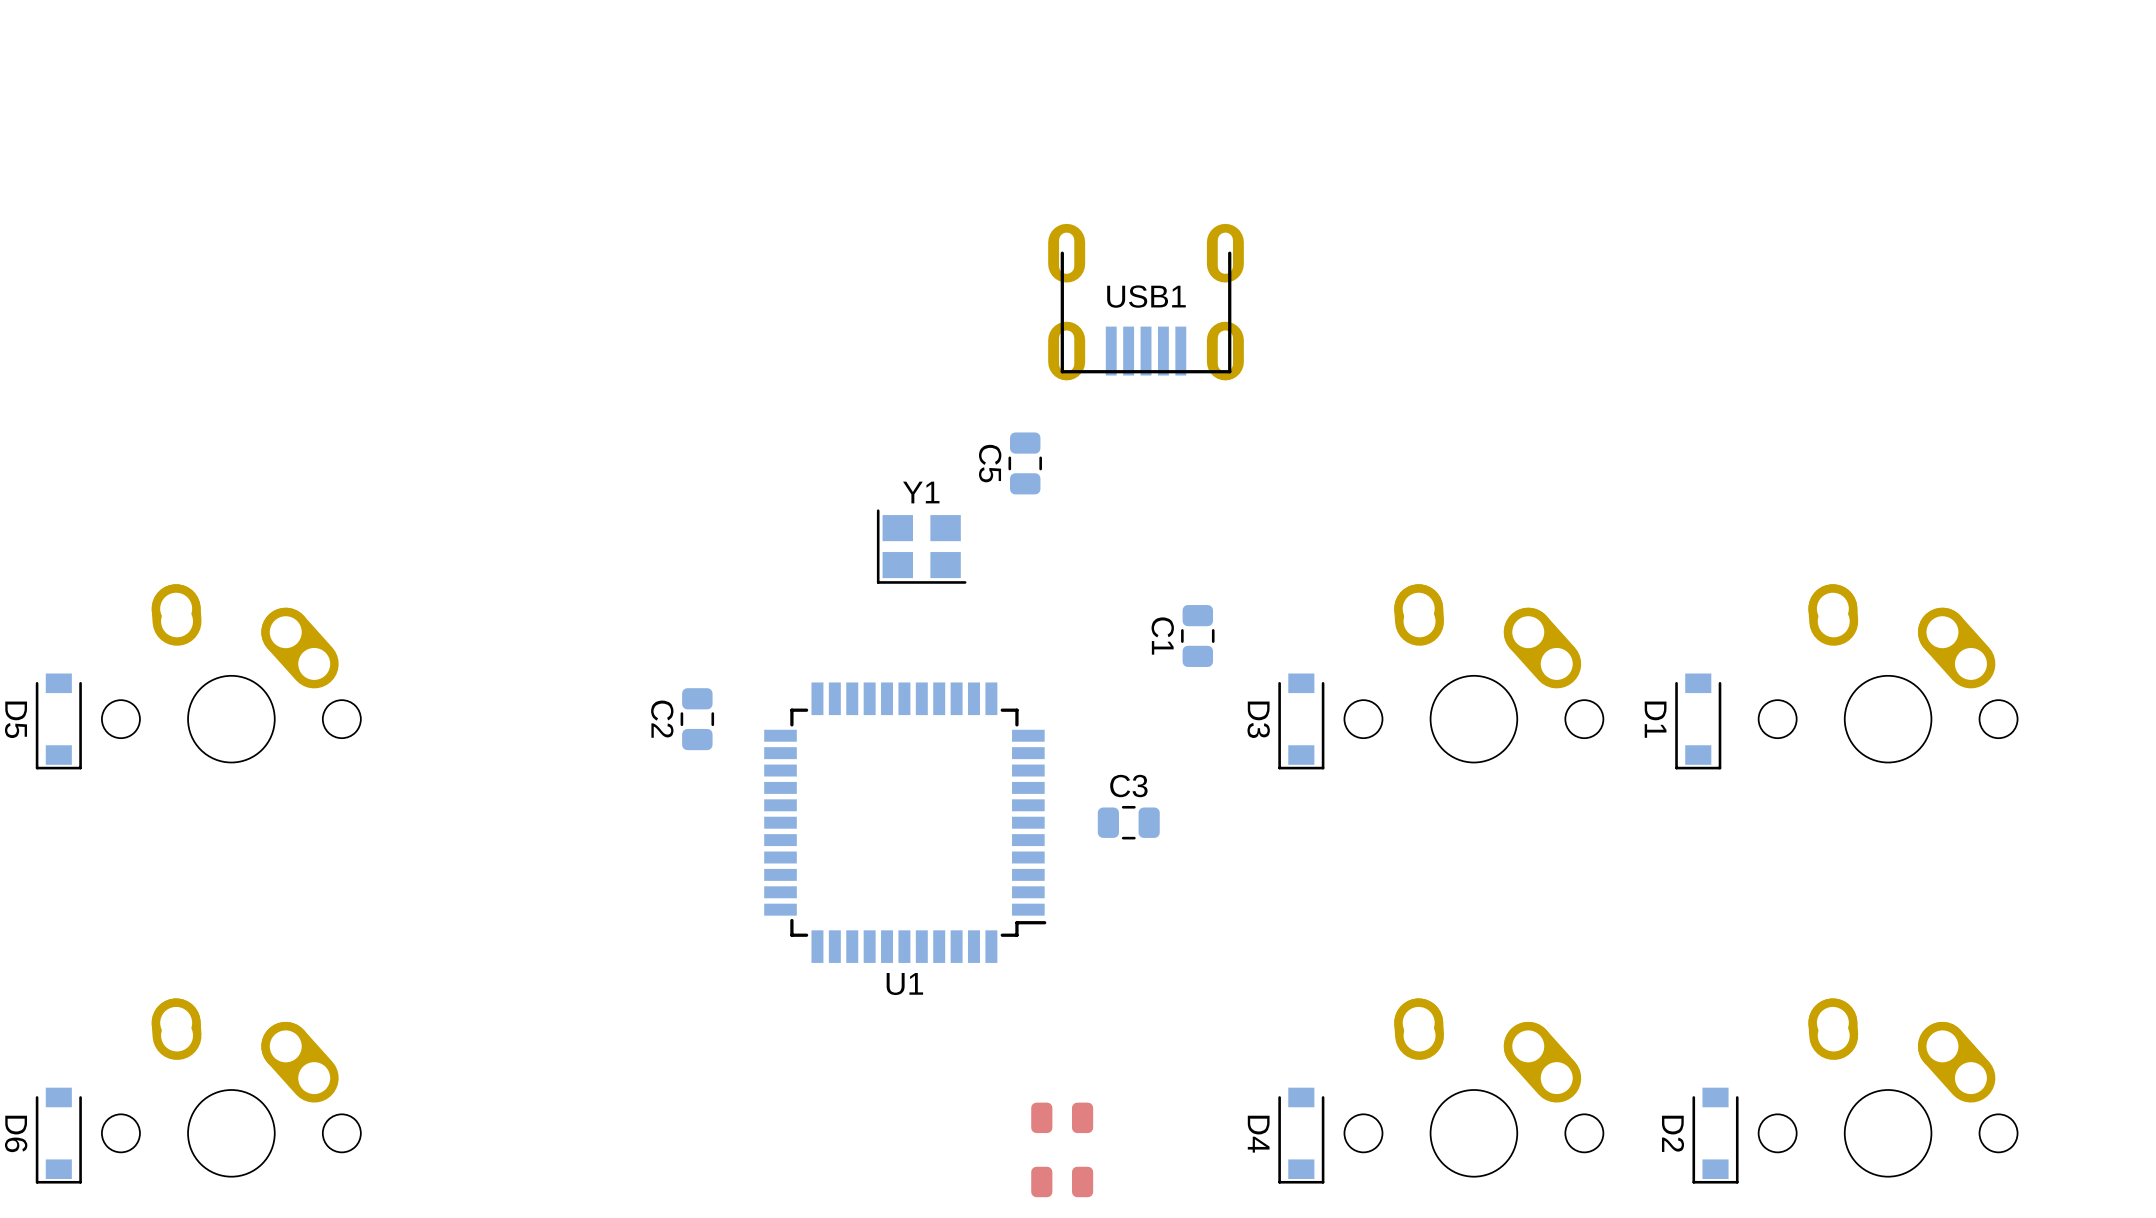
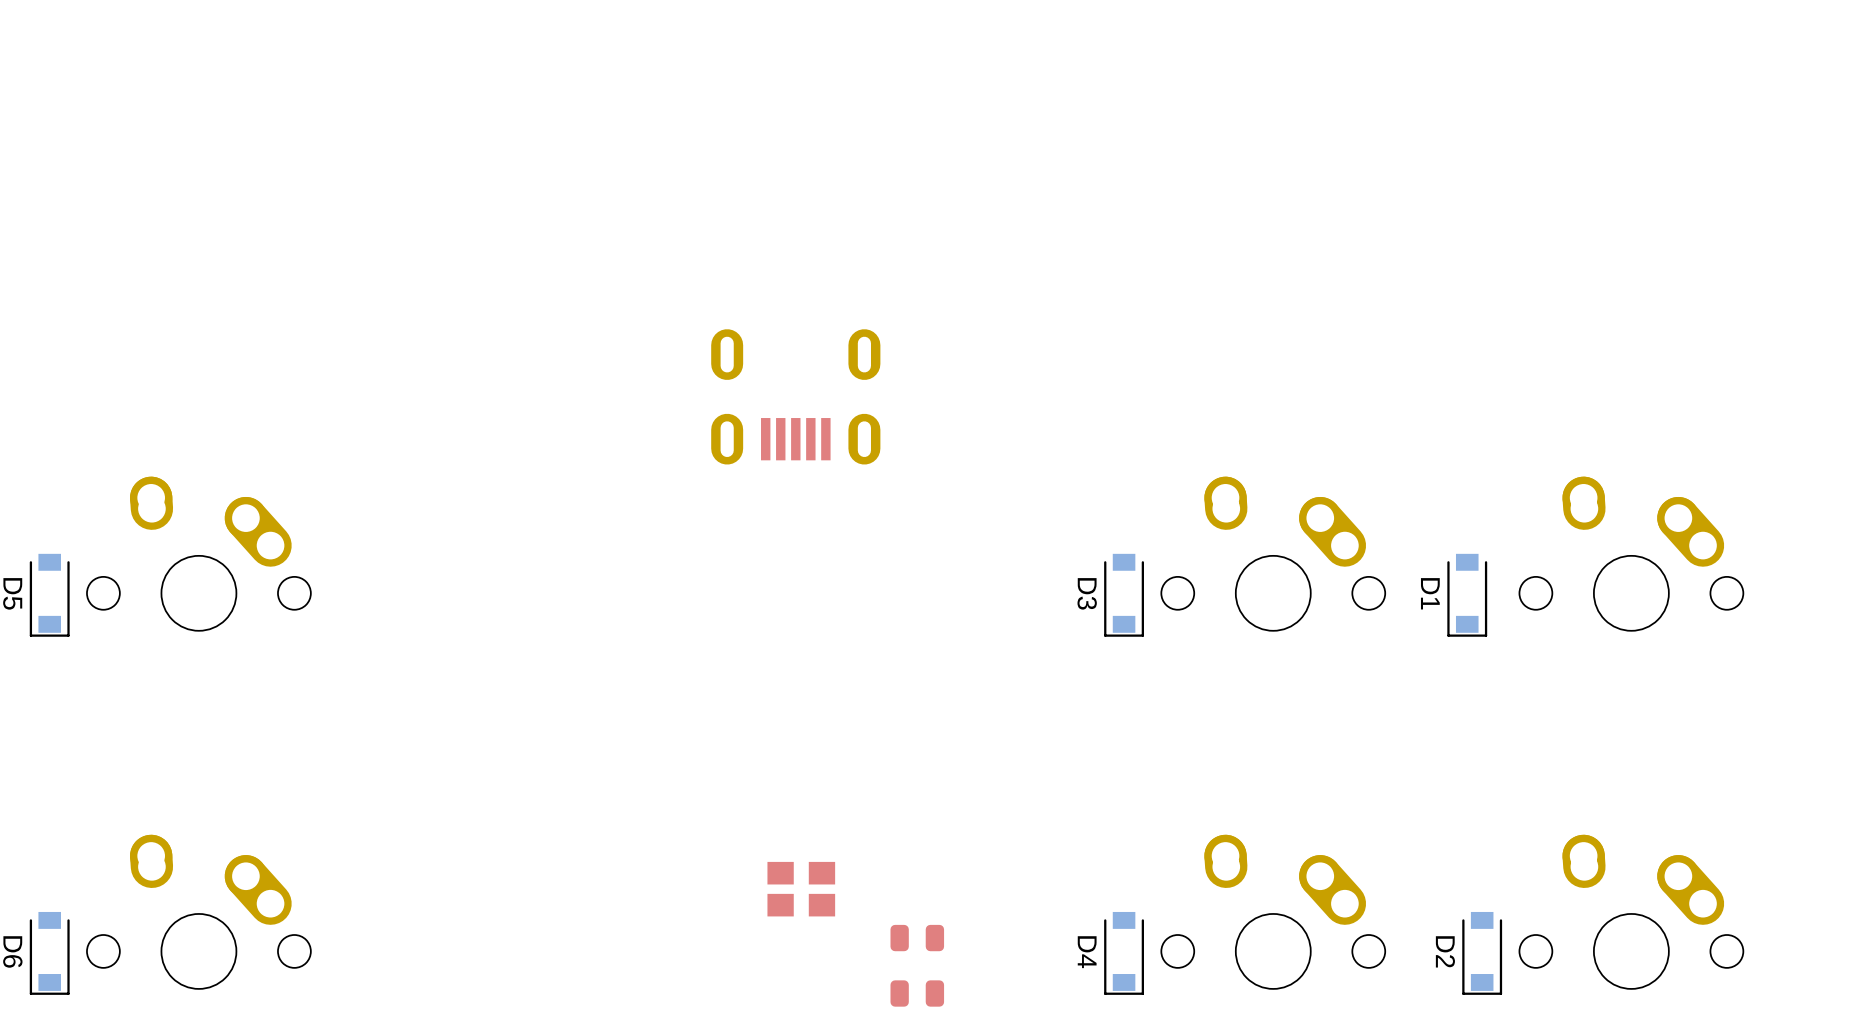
USB1 side: bottom (1146, 302) -> top (795, 396)
C5: (1025, 463) -> none
Y1 side: bottom (921, 546) -> top (801, 889)
C1: (1197, 636) -> none
C2: (697, 719) -> none
U1: (905, 822) -> none
C3: (1128, 822) -> none

